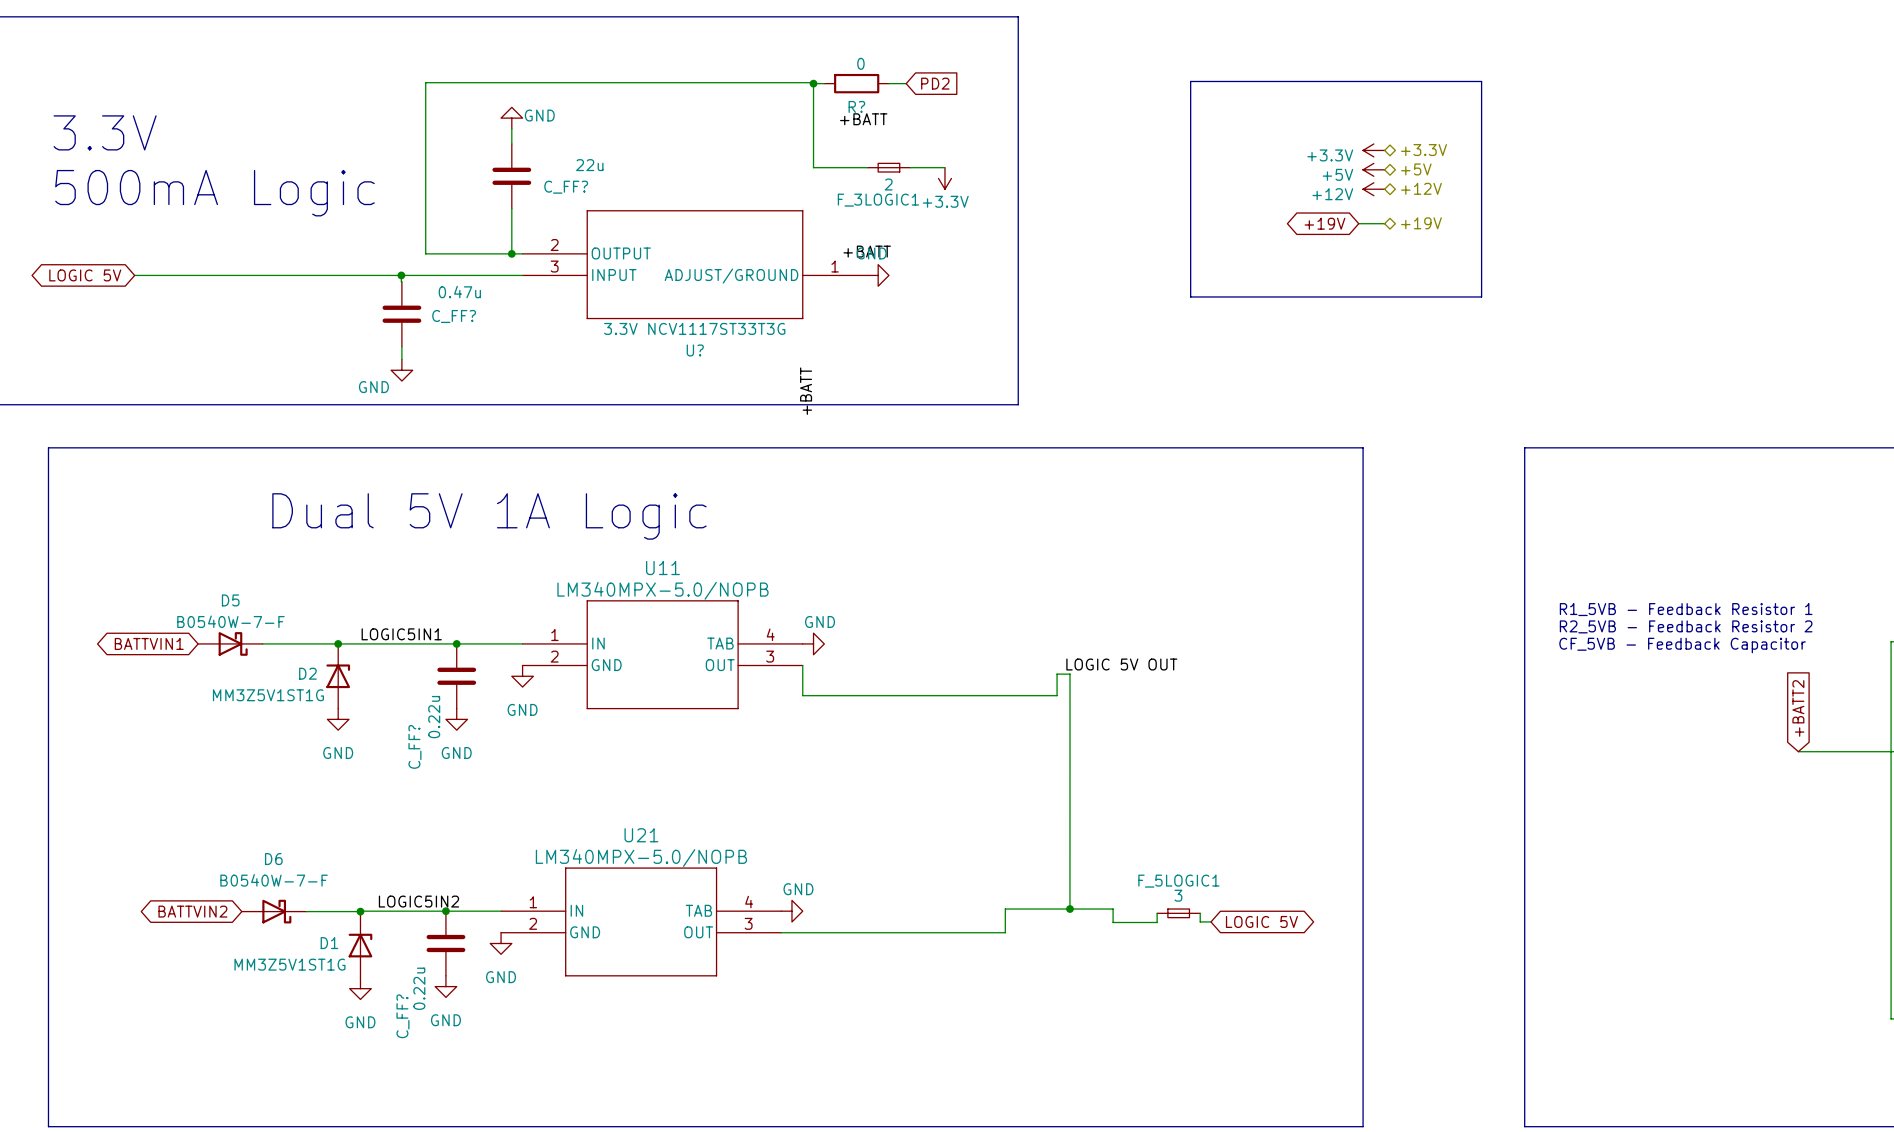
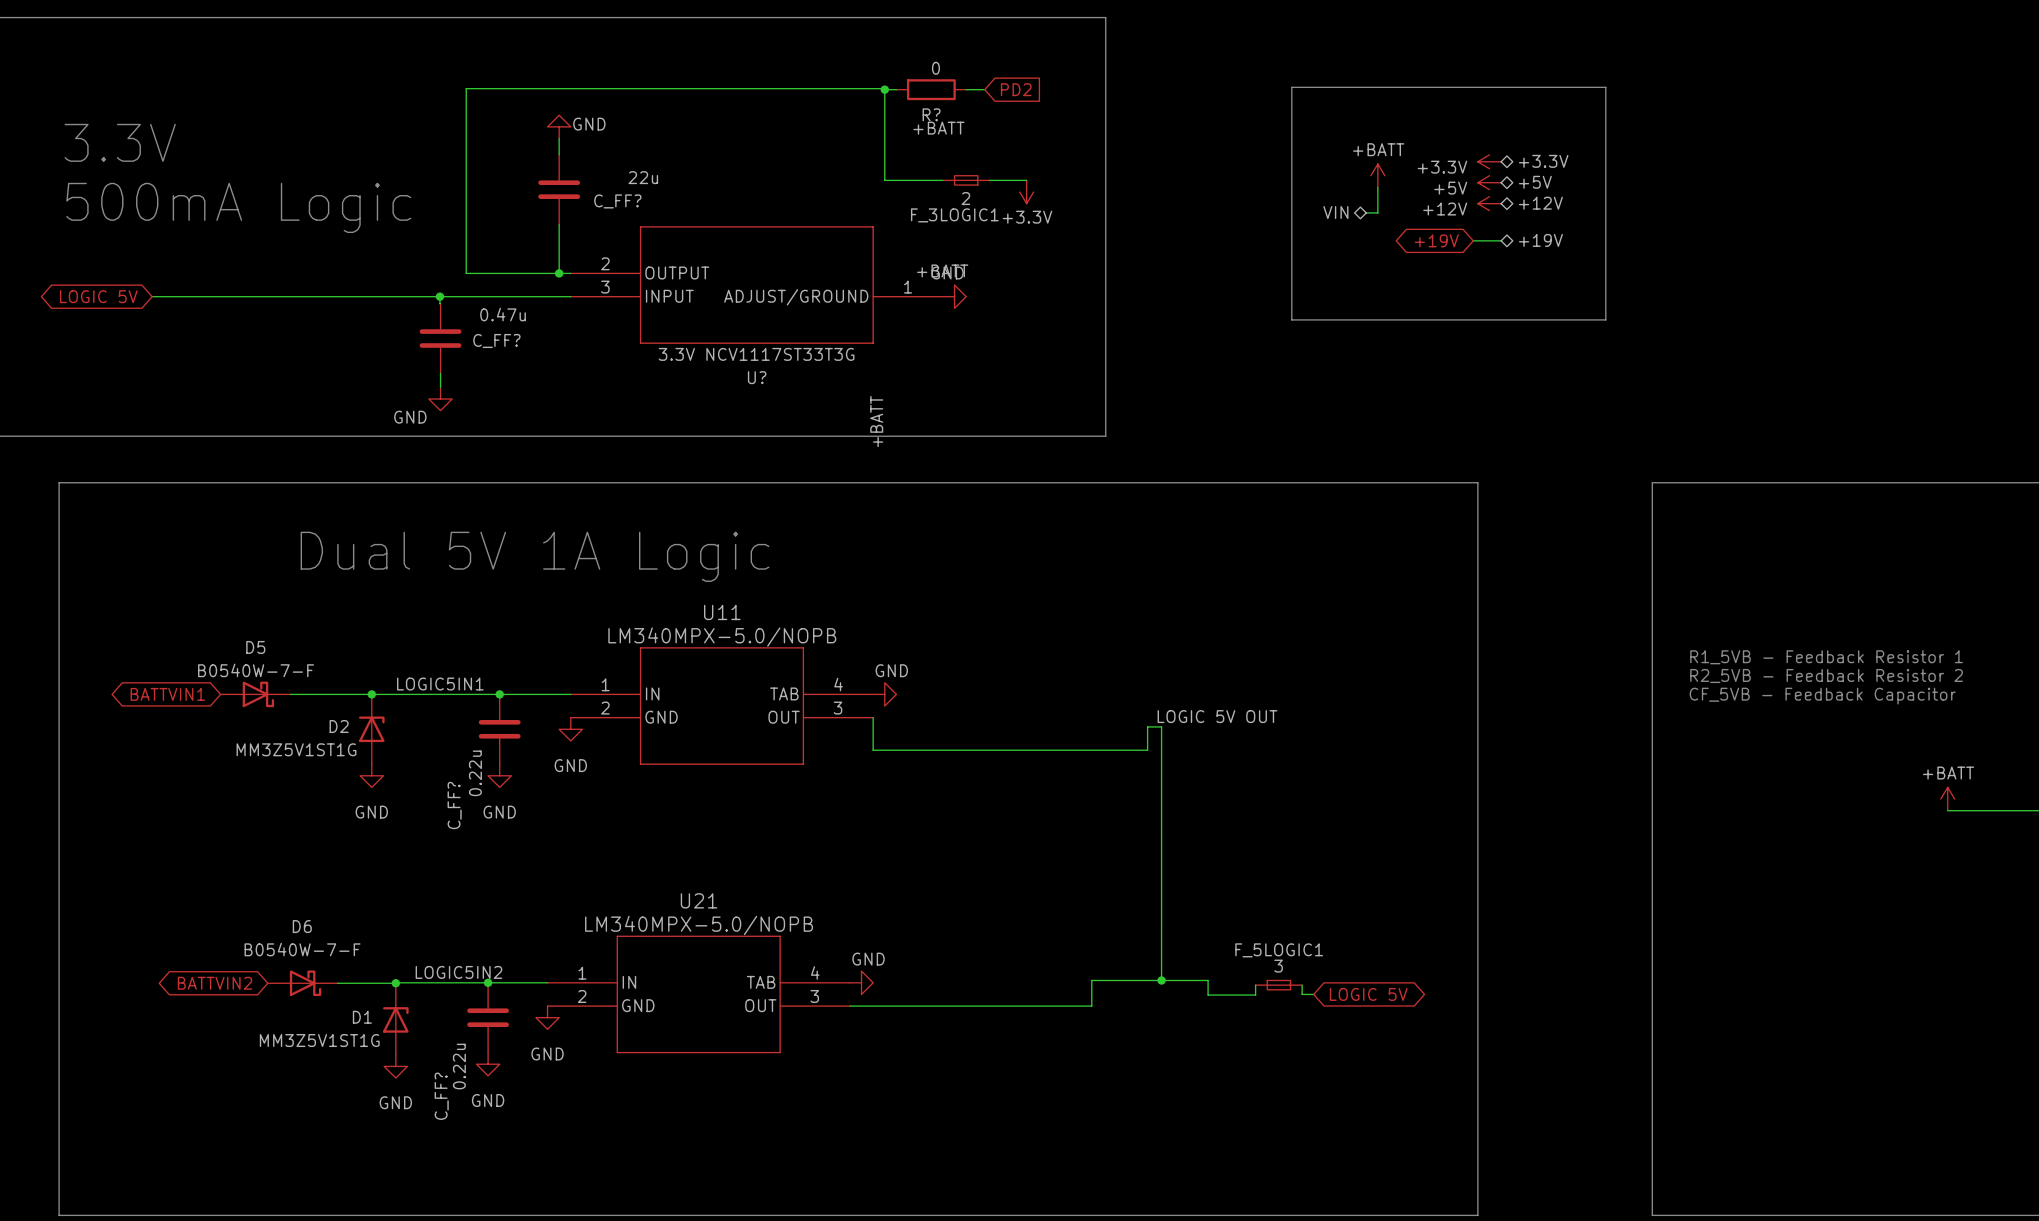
power symbol: none -> +BATT (1377, 175)
wire: none -> (1377, 187) (1377, 212) (1366, 212)
hierarchical label: none -> VIN (1335, 212)
global label: +BATT2 (1798, 708) -> none
power symbol: none -> +BATT (1947, 799)

